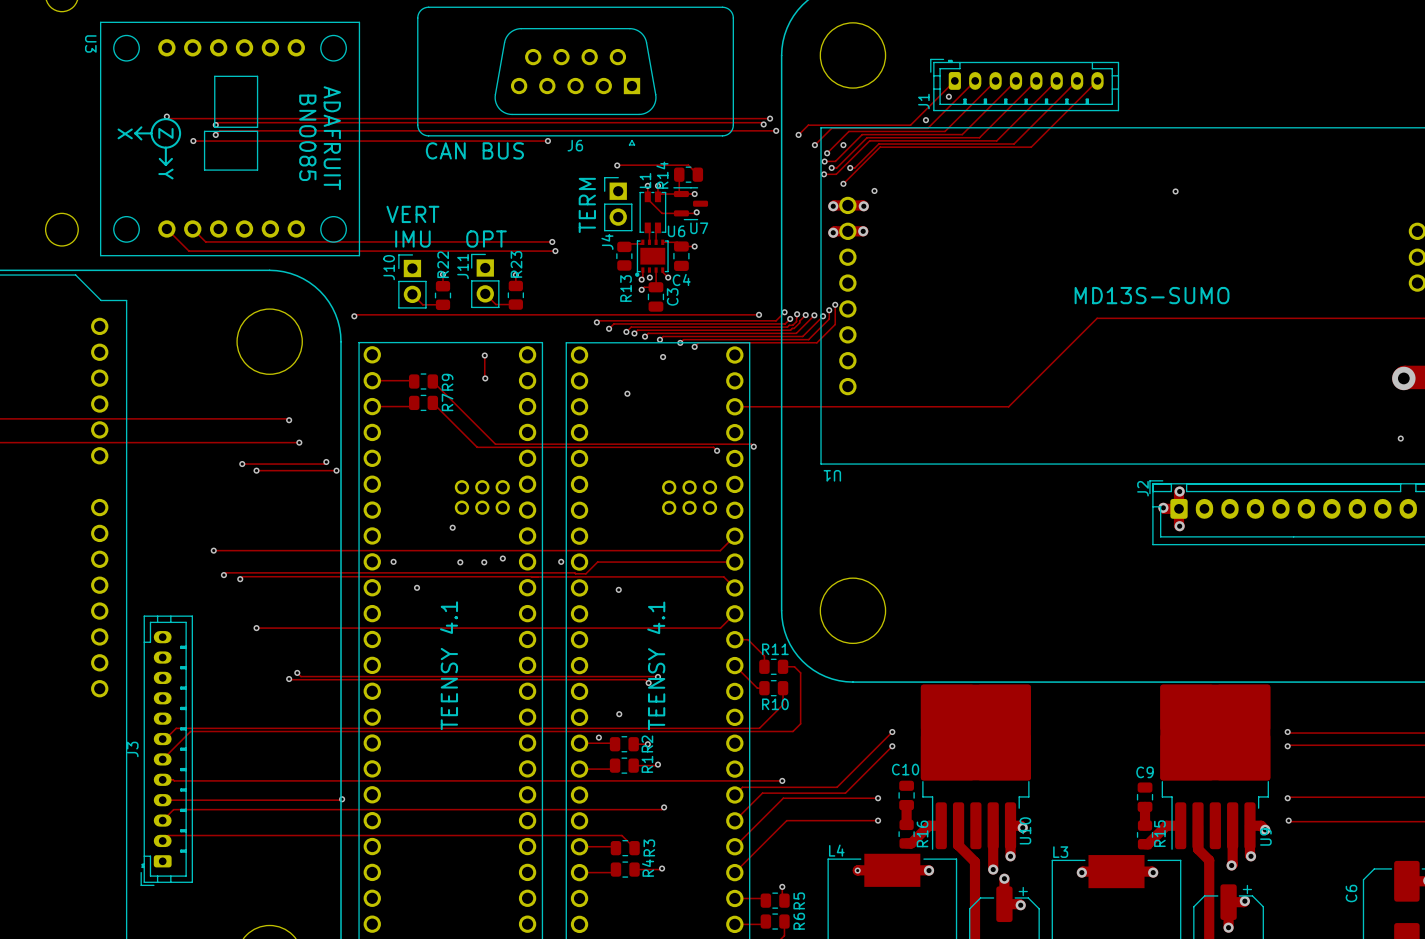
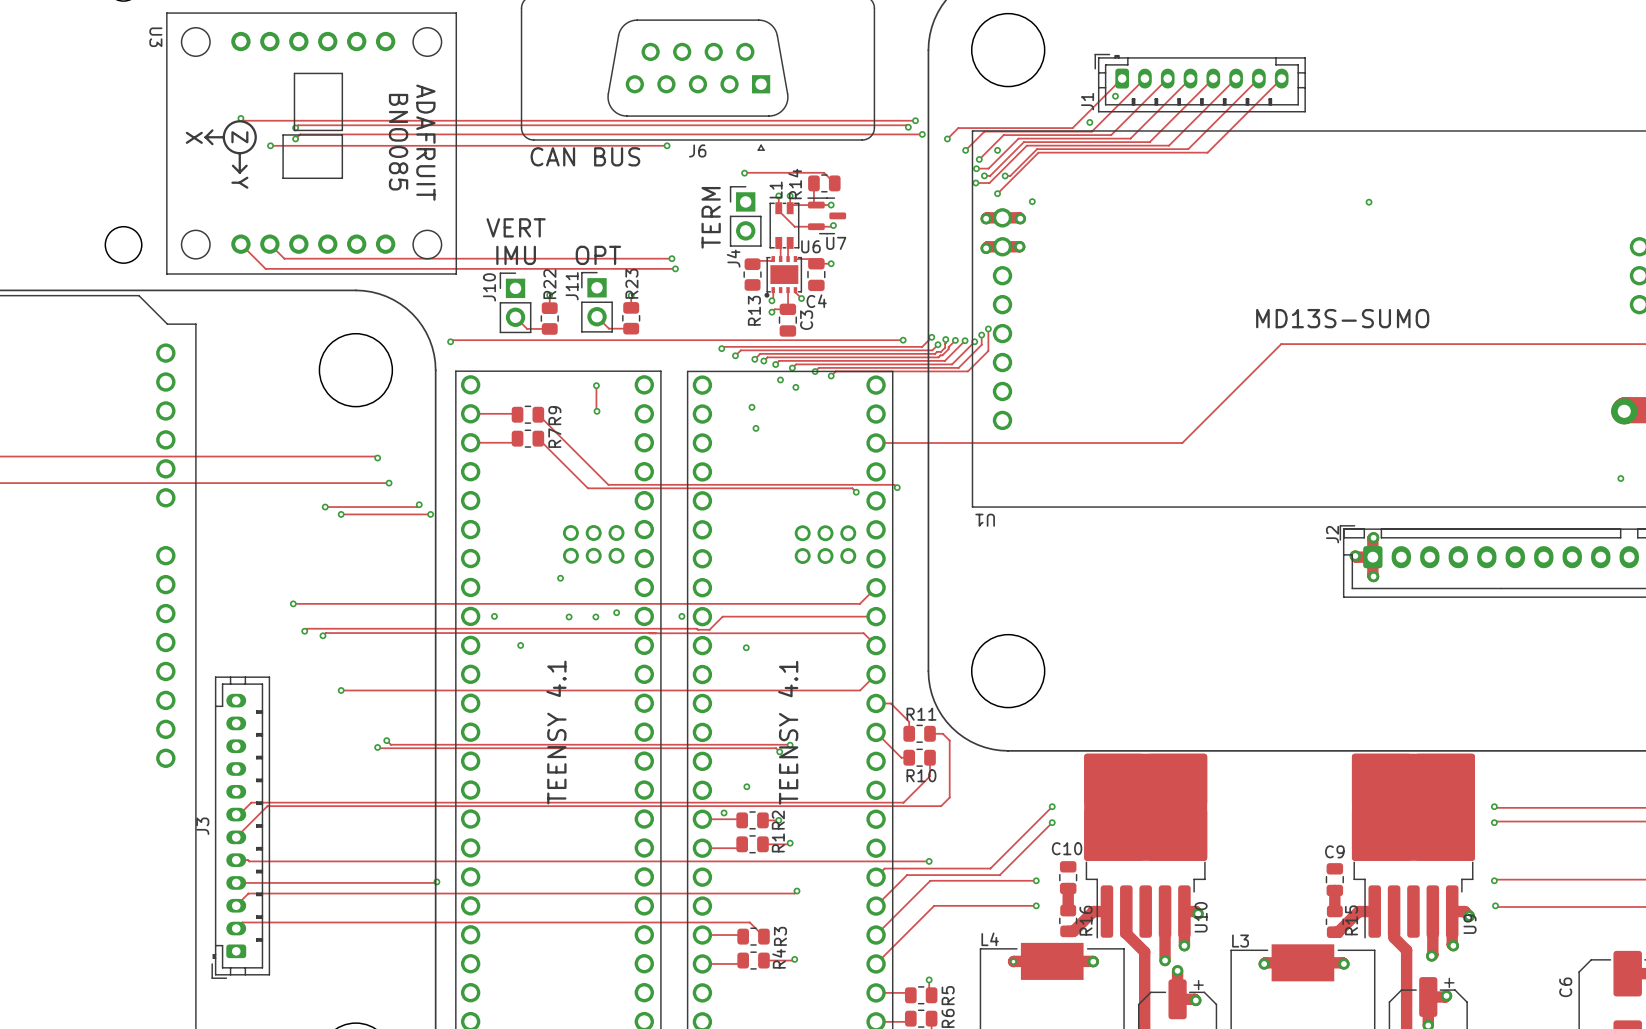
via: (649, 277) -> none
via: none -> (780, 379)
via: none -> (751, 407)

